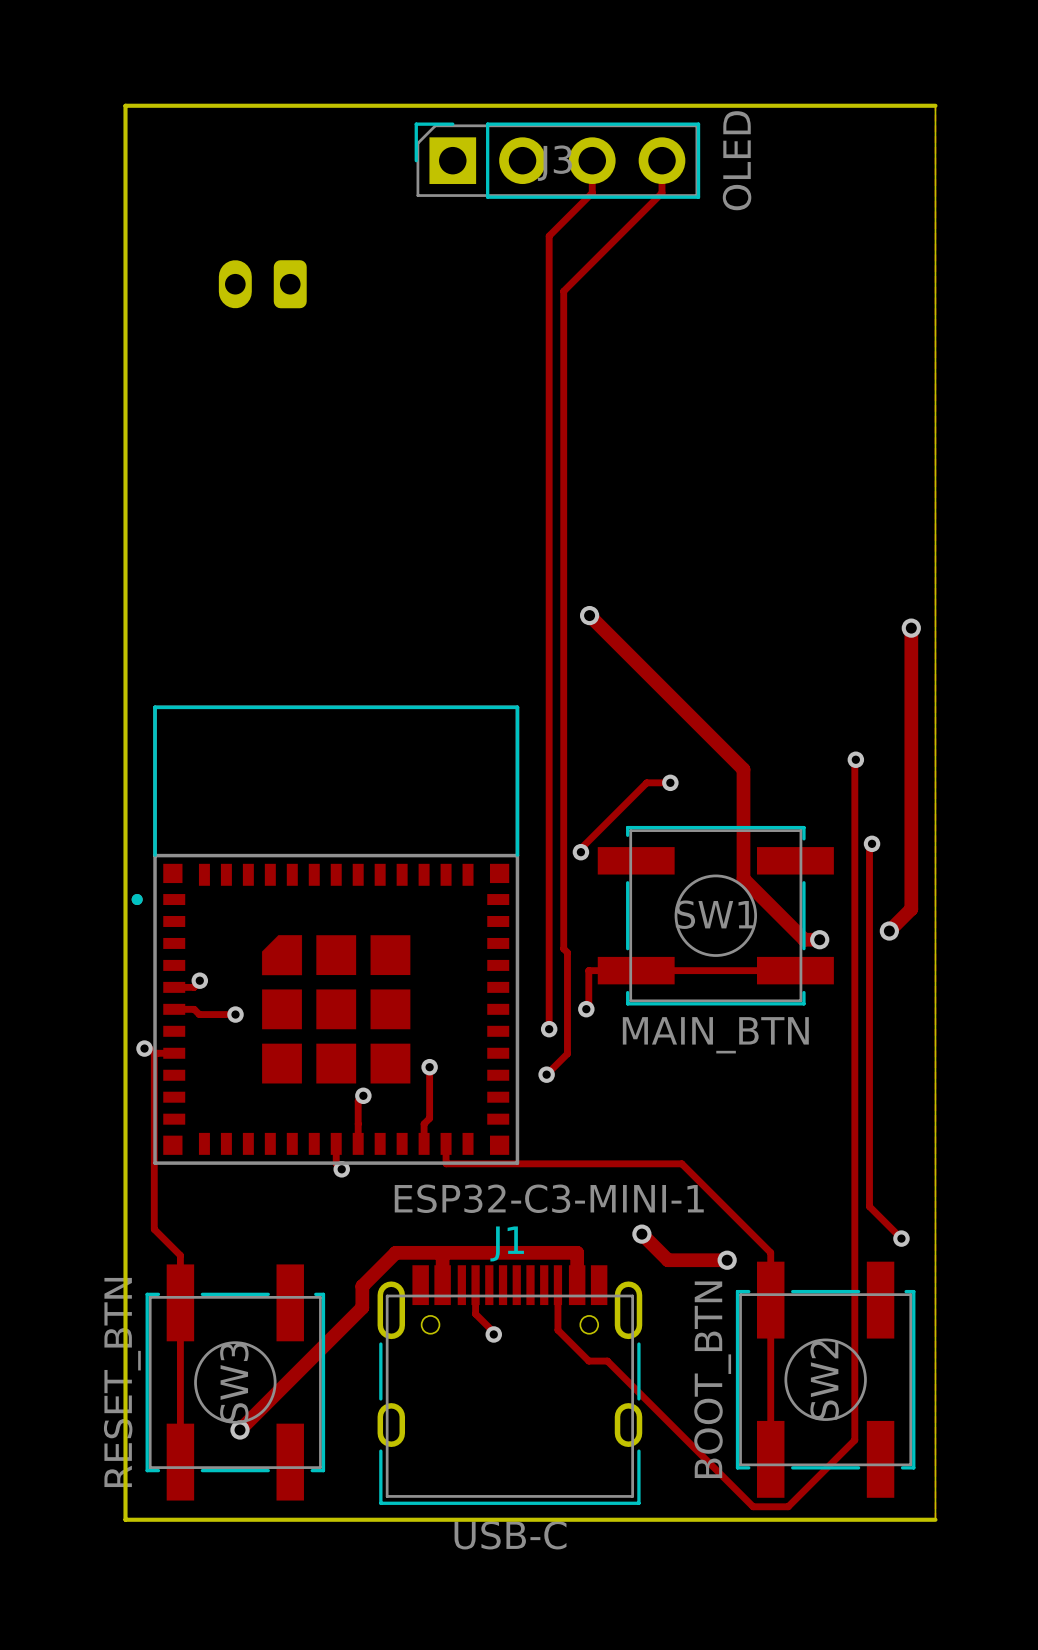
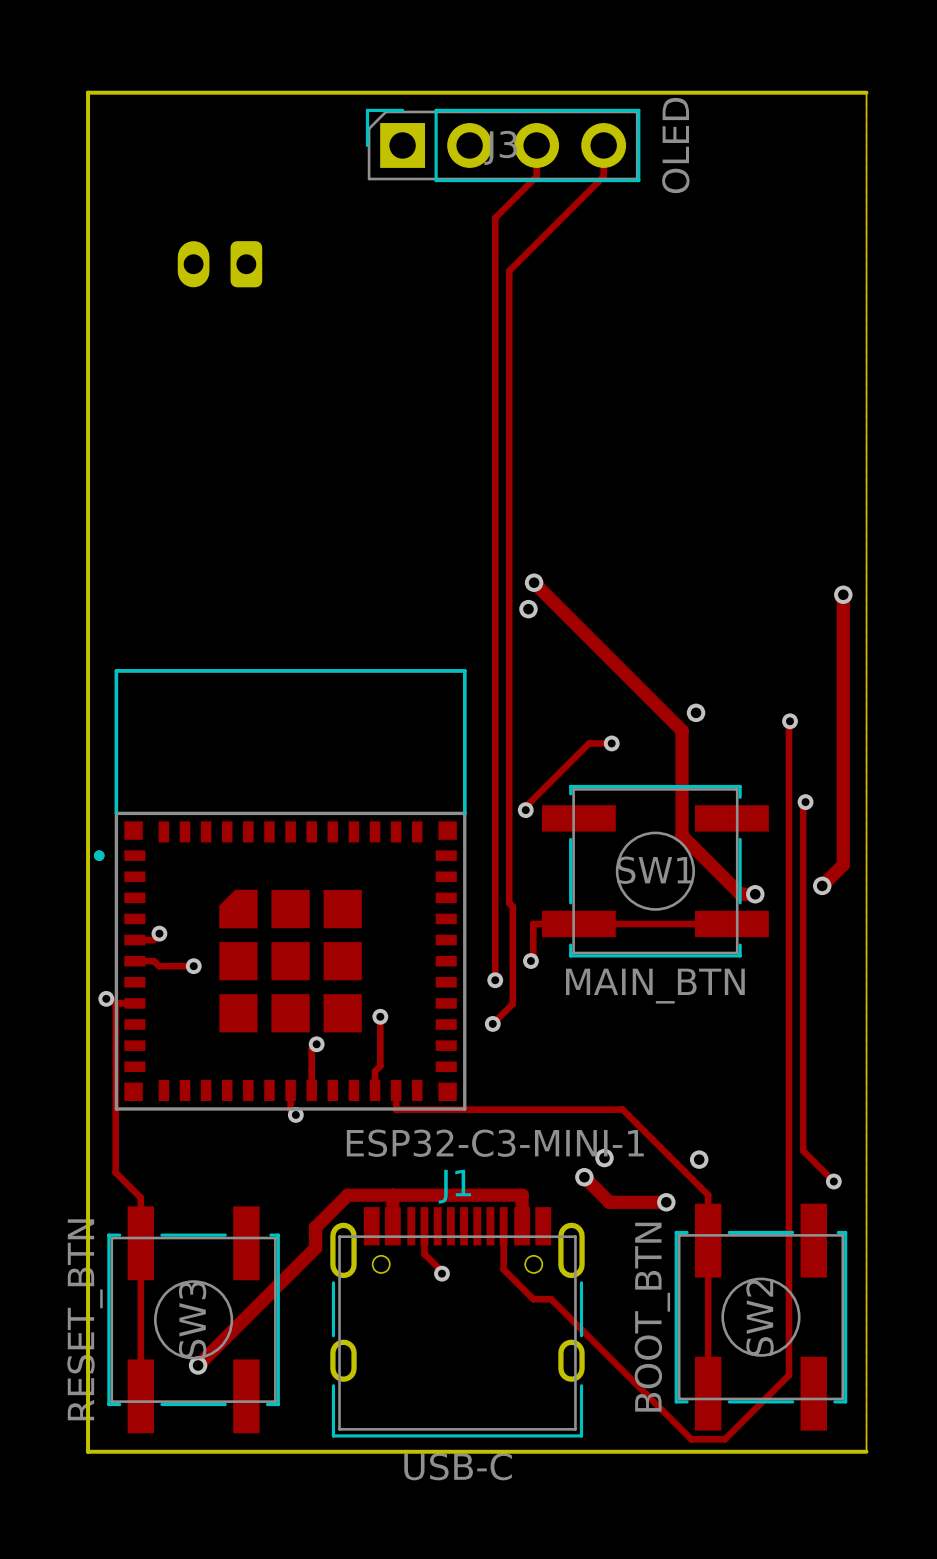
via: none -> (528, 609)
via: none -> (696, 712)
via: none -> (604, 1158)
via: none -> (699, 1159)

